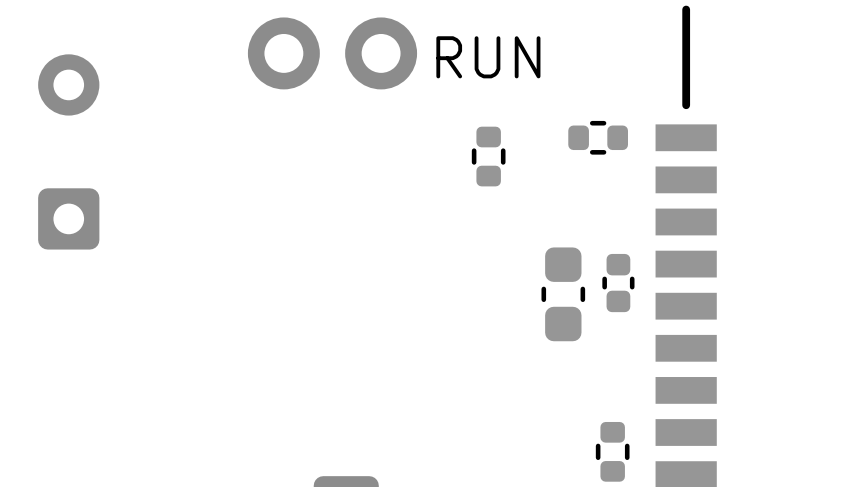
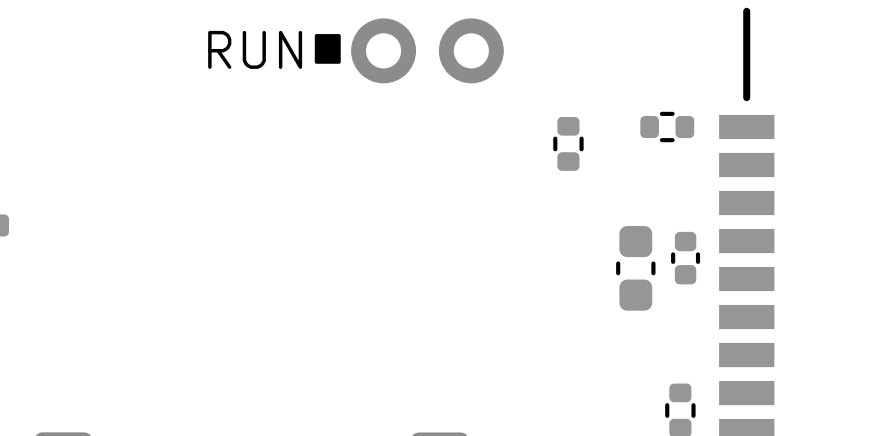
drawing: none -> [314, 34, 341, 64]
text position: RUN (488, 57) -> RUN (255, 49)
part: (68, 151) -> none

